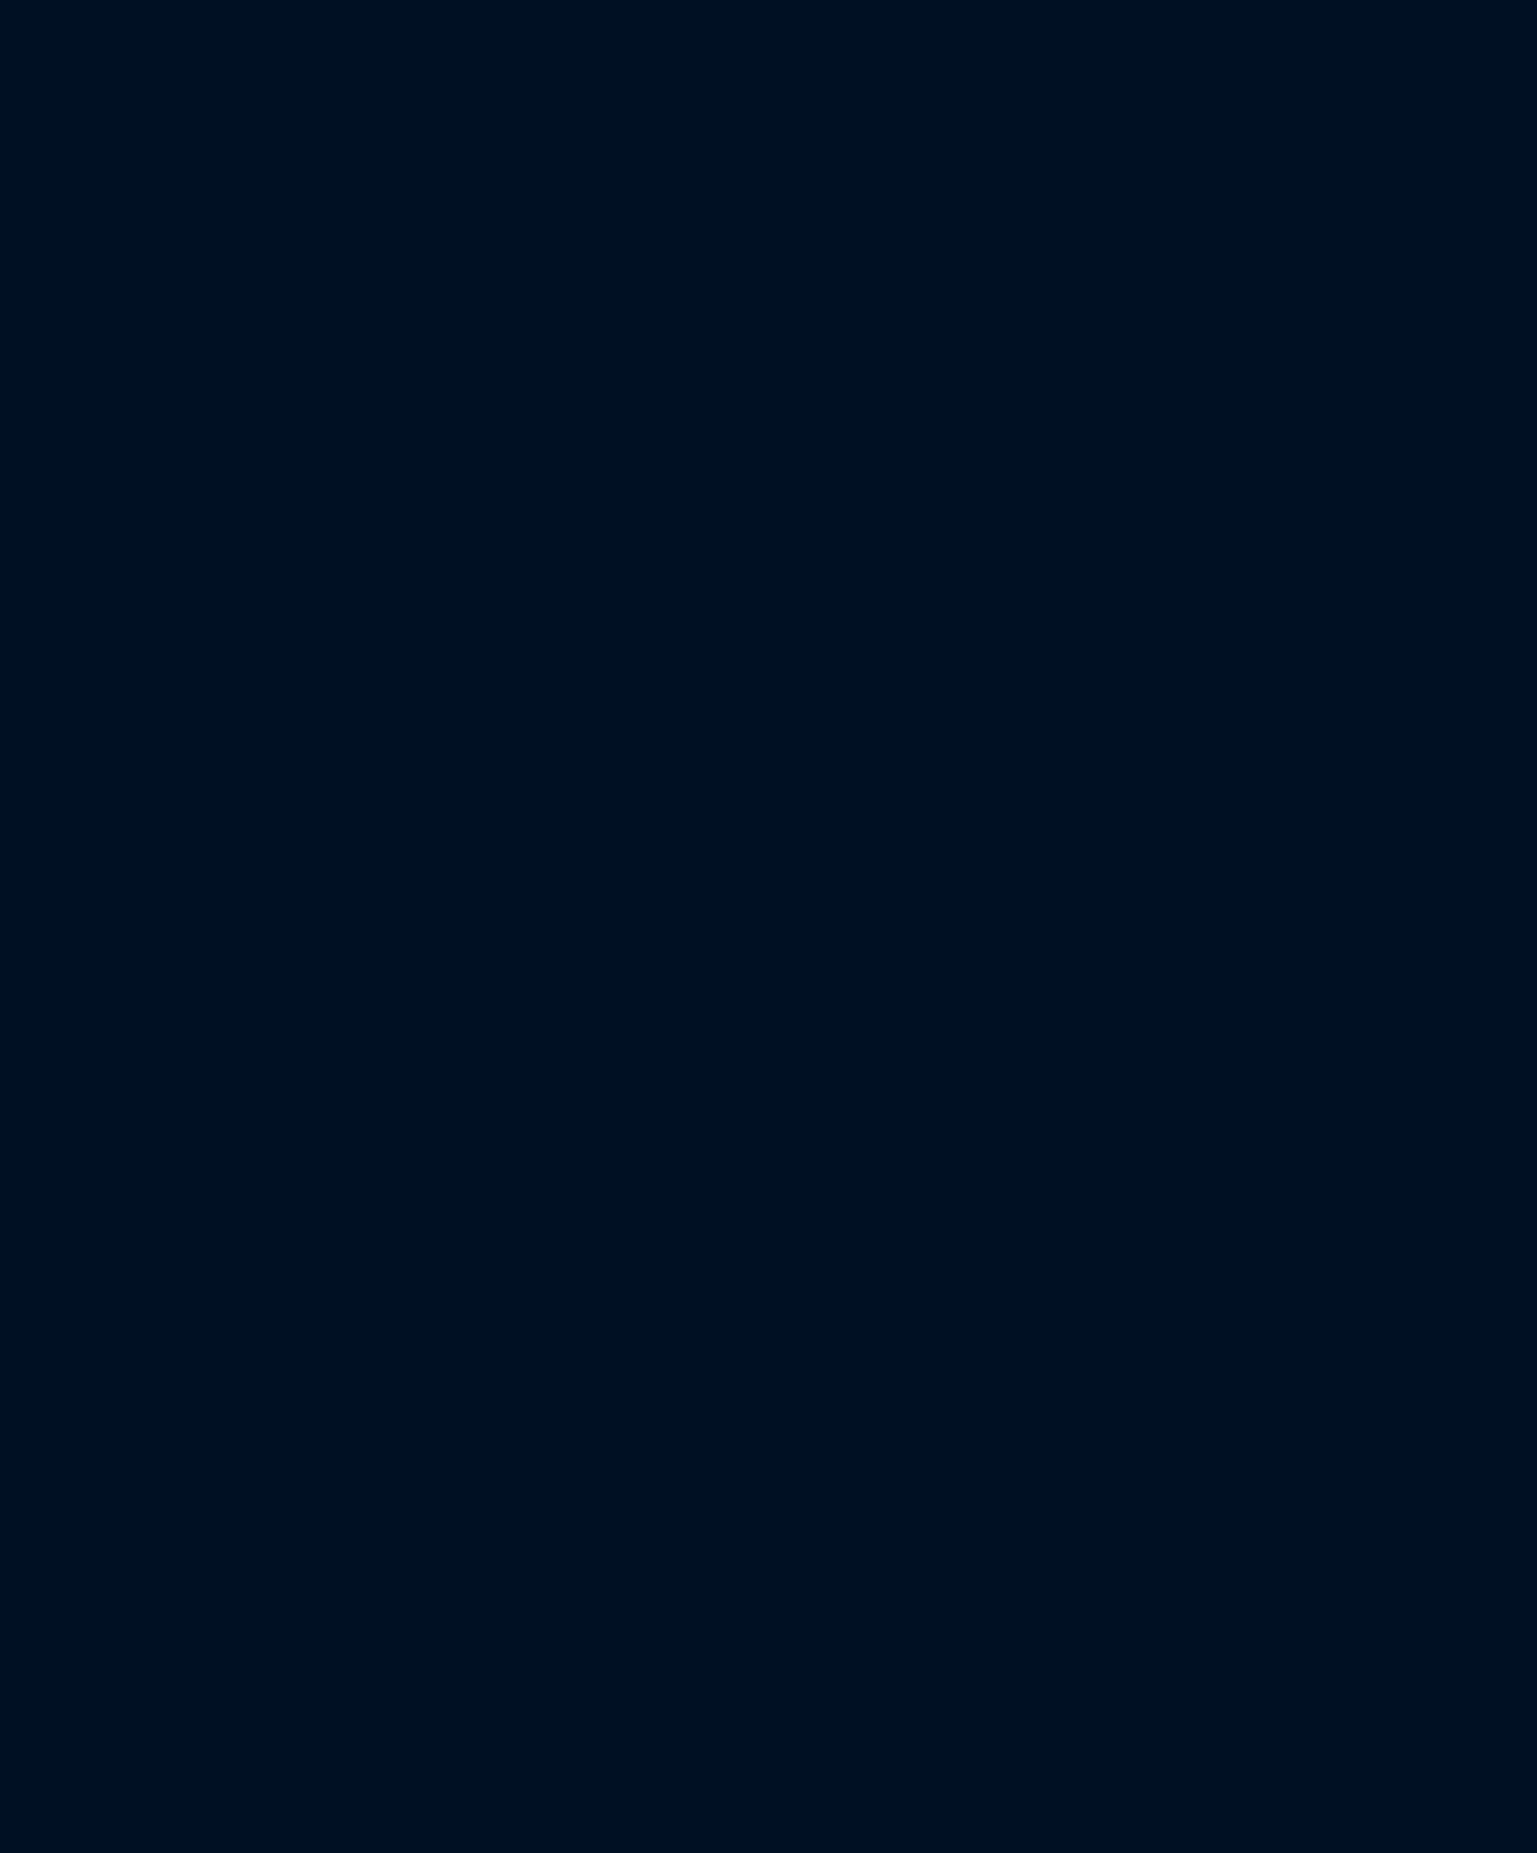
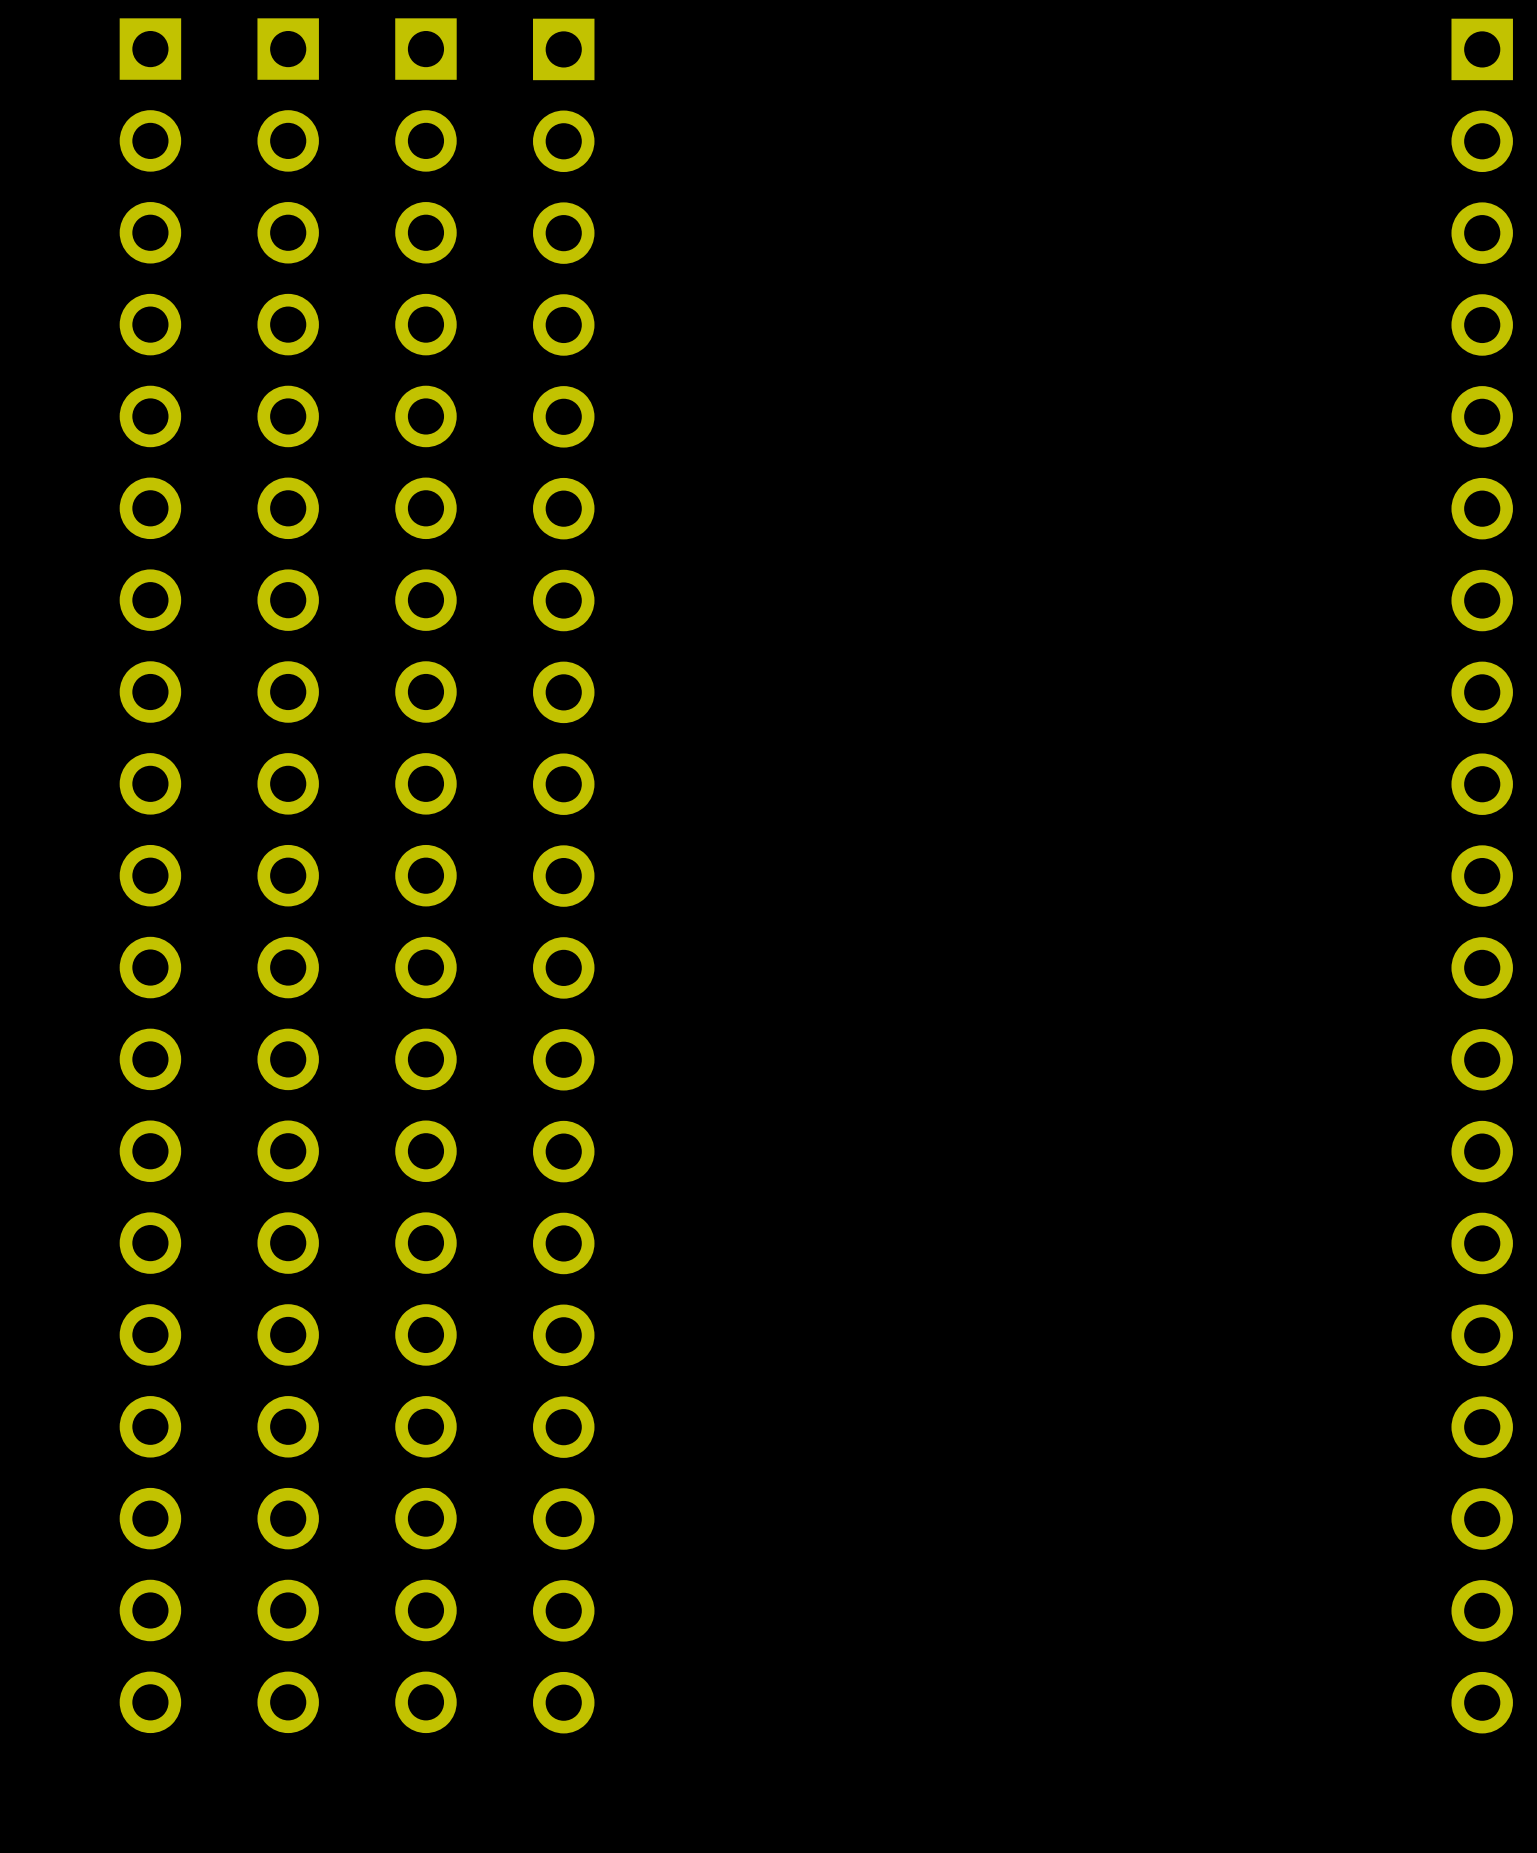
part: none -> (150, 875)
part: none -> (288, 875)
part: none -> (425, 875)
part: none -> (563, 876)
part: none -> (1482, 876)

